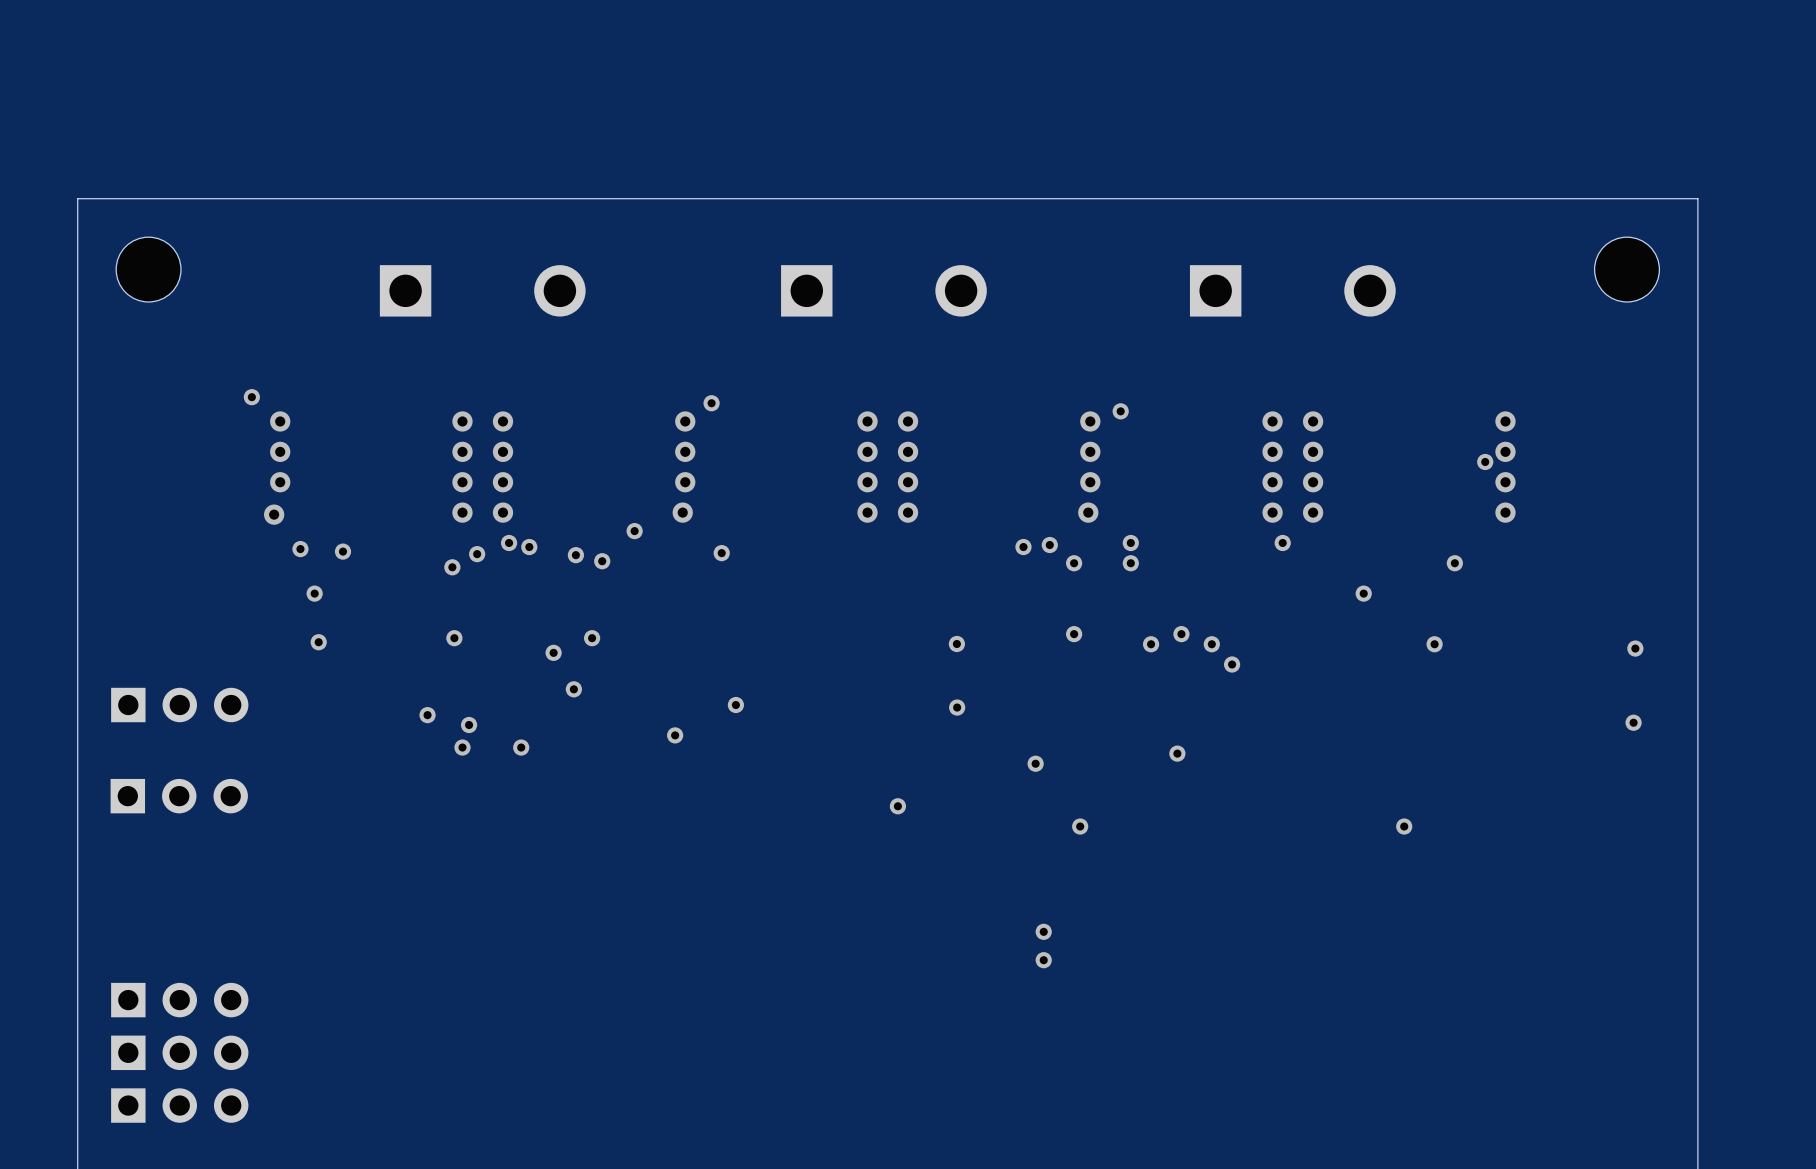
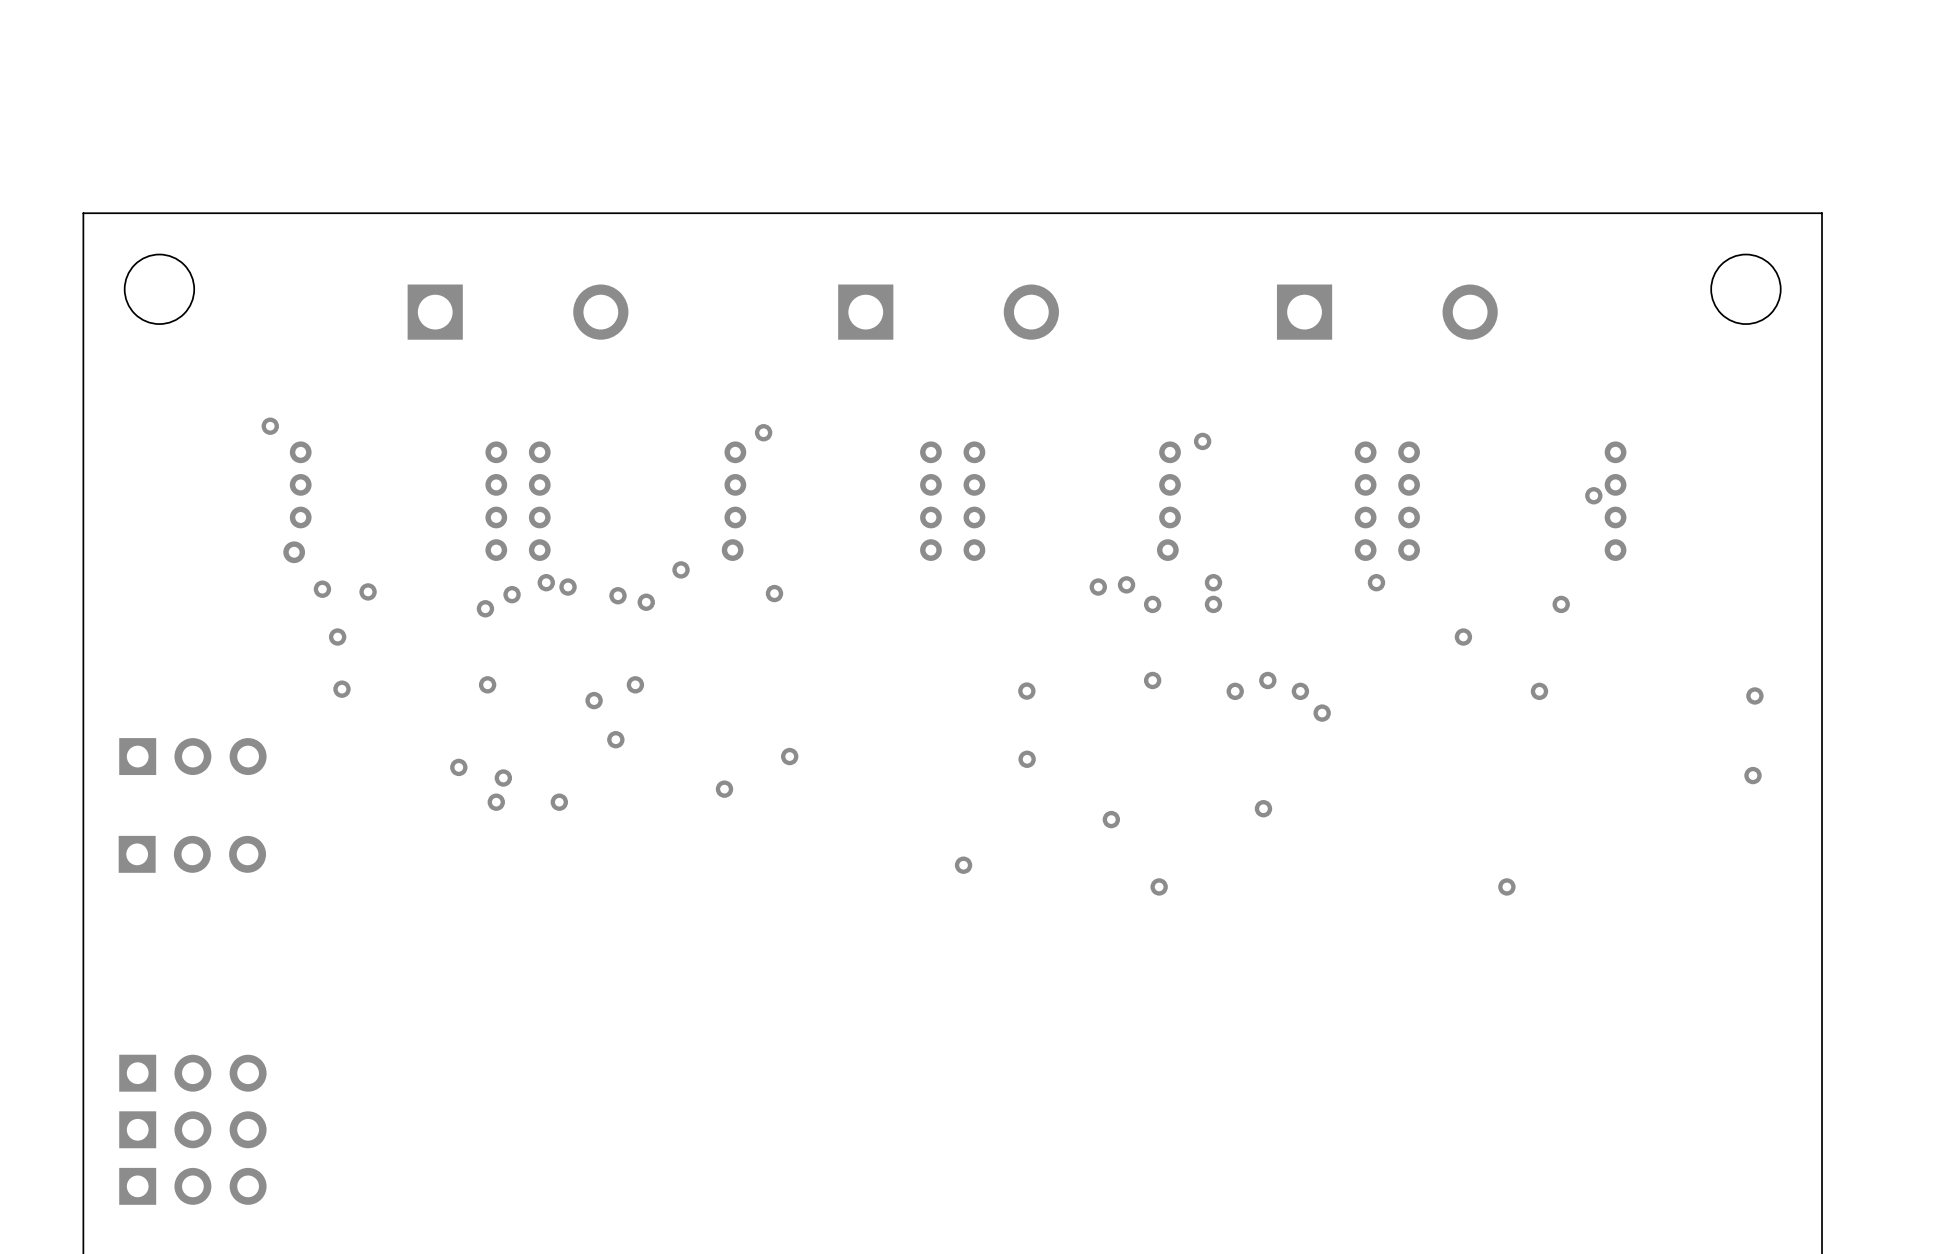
via: (1043, 931) -> none
via: (1043, 960) -> none

